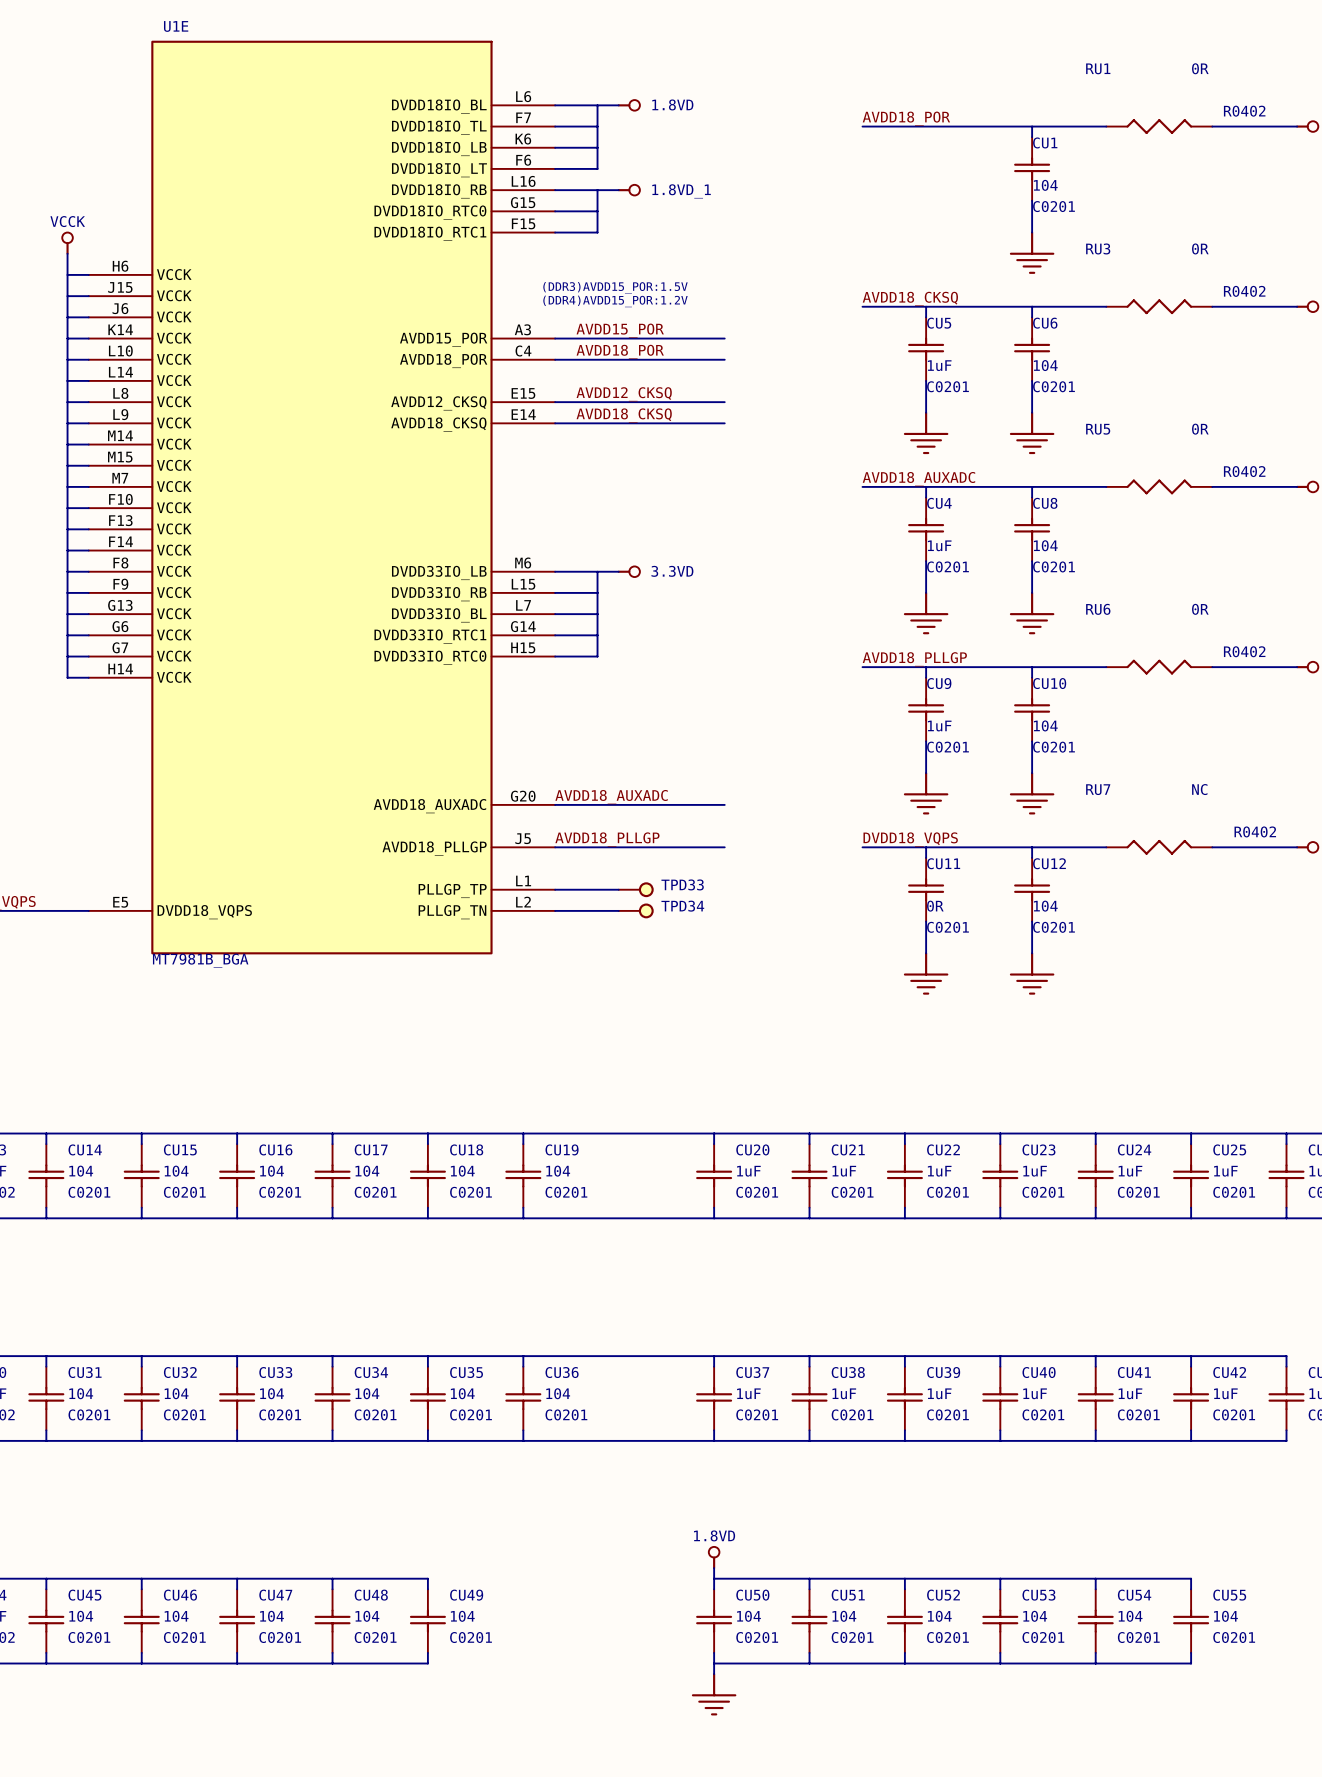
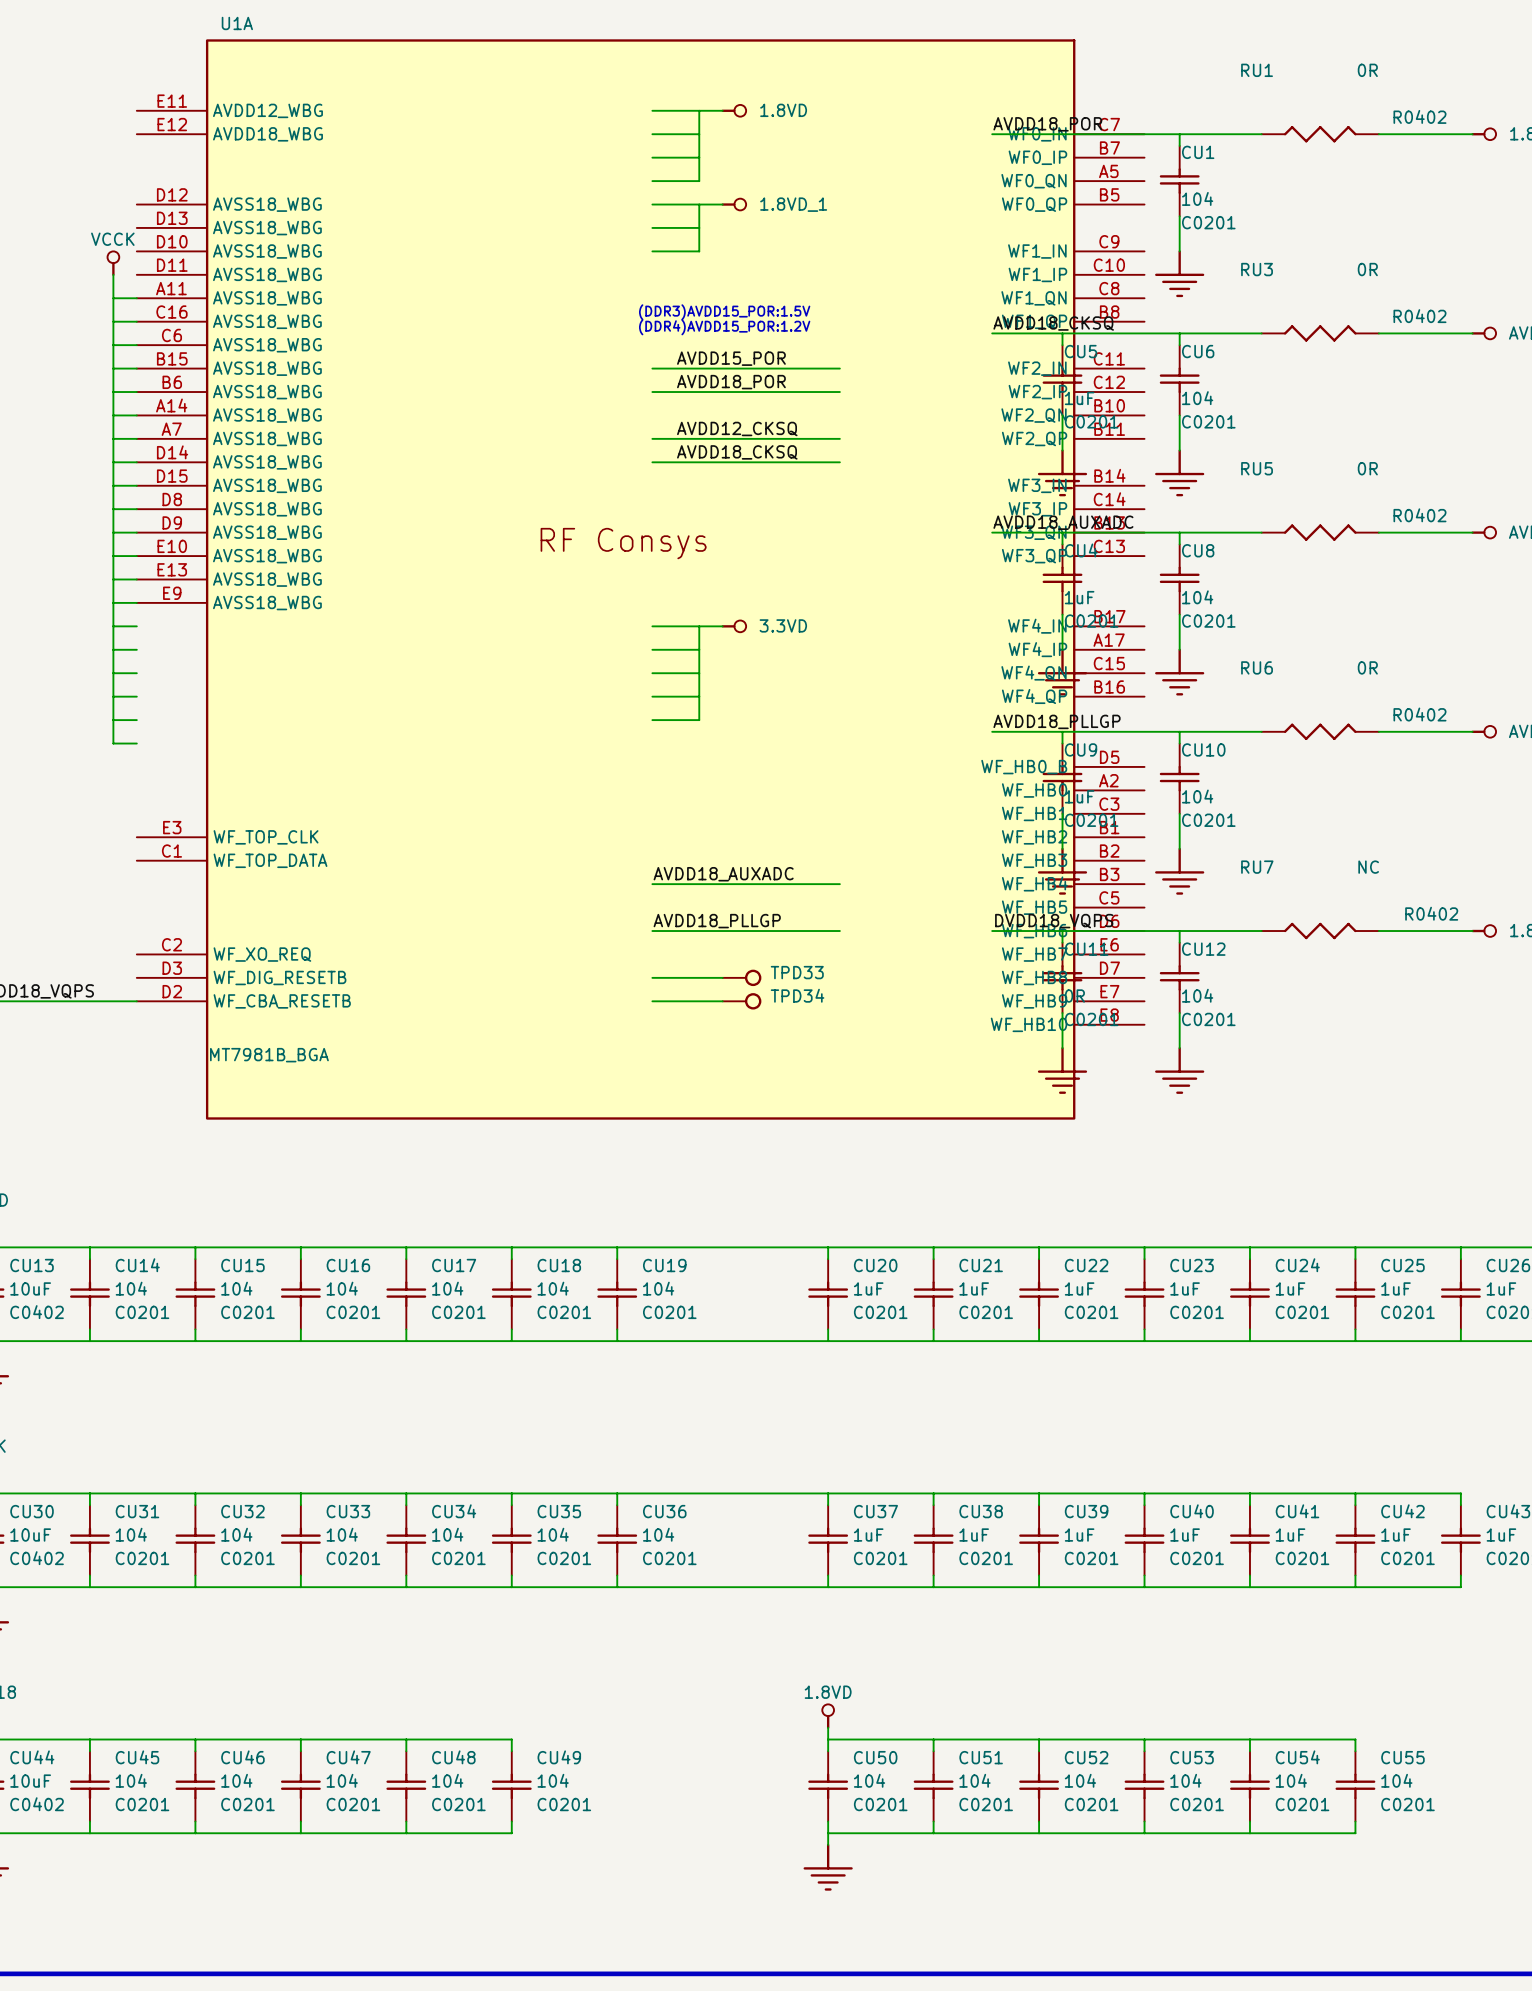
U1E: MT7981B_BGA (321, 497) -> none
U1A: none -> MT7981B_BGA (640, 579)

